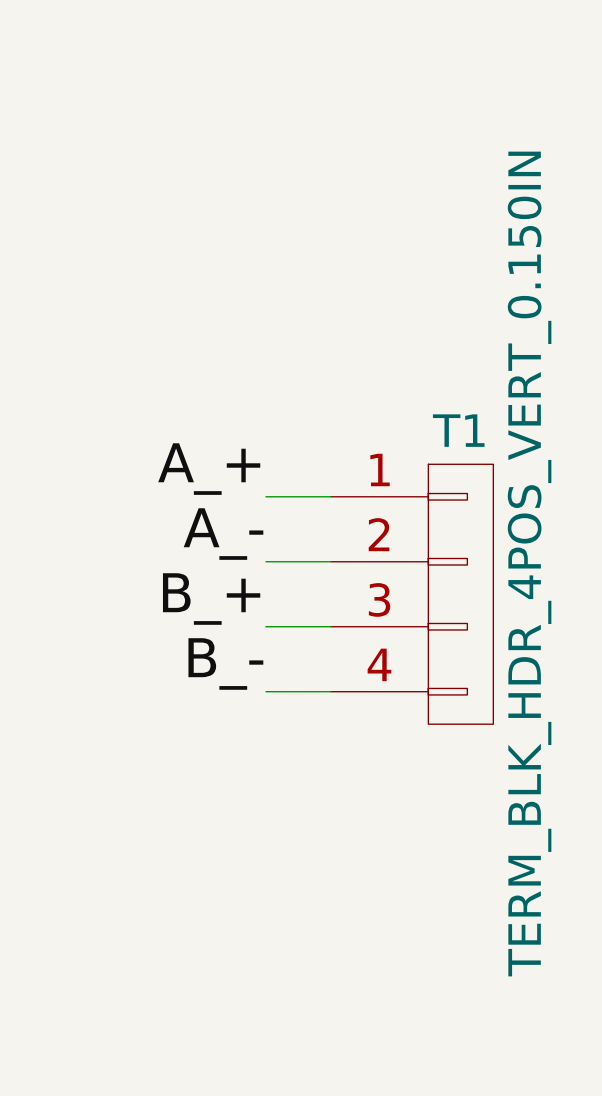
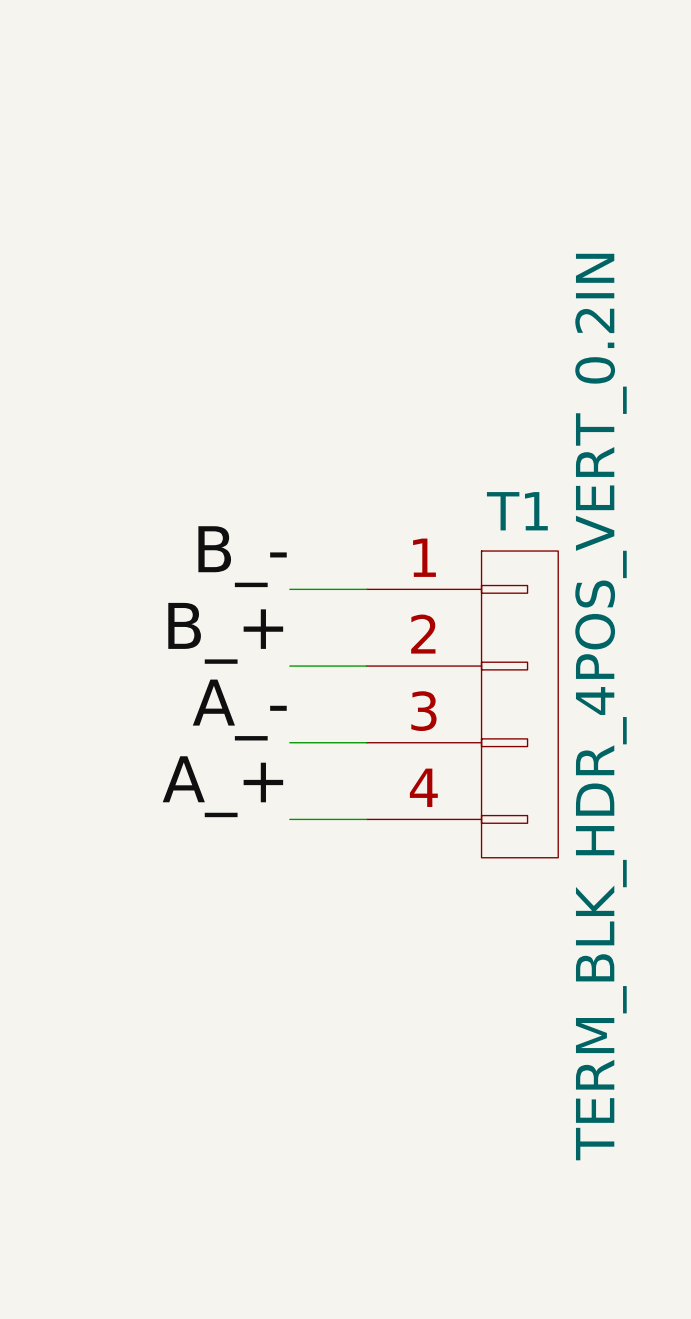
label: A_+ (209, 469) -> B_- (242, 556)
label: A_- (223, 534) -> B_+ (225, 633)
T1 value: TERM_BLK_HDR_4POS_VERT_0.150IN (529, 564) -> TERM_BLK_HDR_4POS_VERT_0.2IN (600, 707)
label: B_+ (211, 599) -> A_- (239, 710)
label: B_- (225, 664) -> A_+ (222, 786)

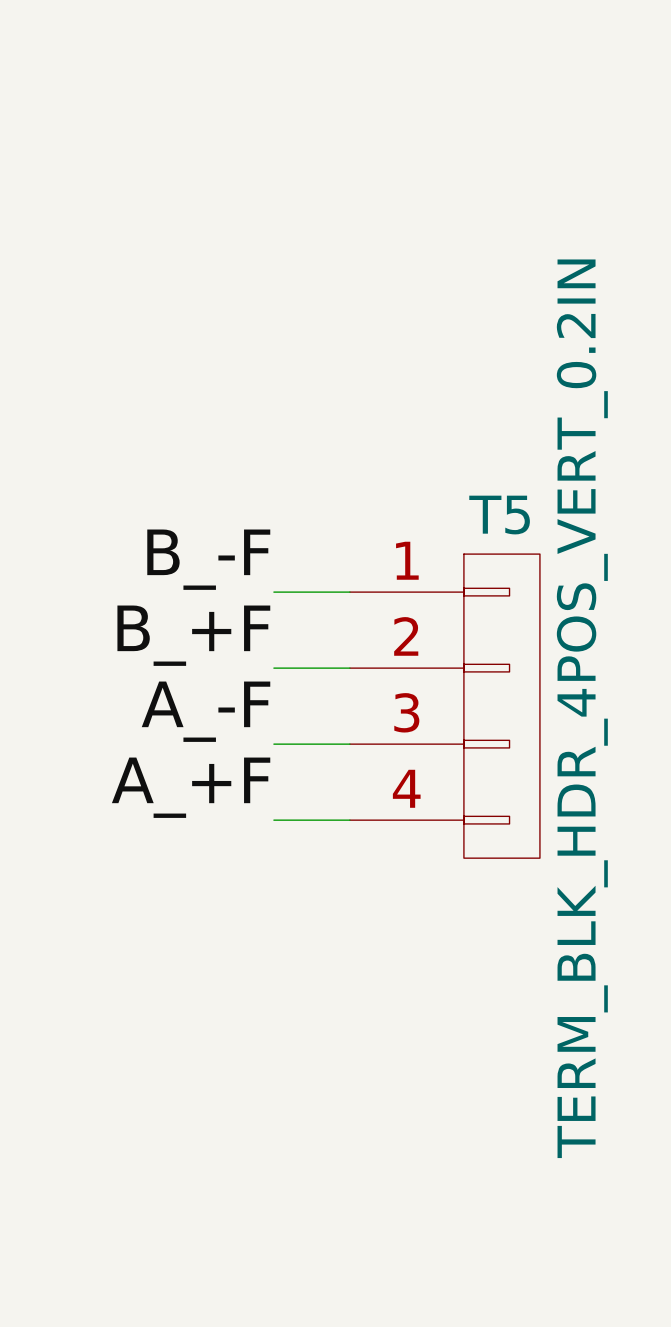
T1 name: T1 (517, 511) -> T5 (499, 515)
label: B_- (242, 556) -> B_-F (208, 559)
label: B_+ (225, 633) -> B_+F (193, 635)
label: A_- (239, 710) -> A_-F (206, 711)
label: A_+ (222, 786) -> A_+F (191, 787)

